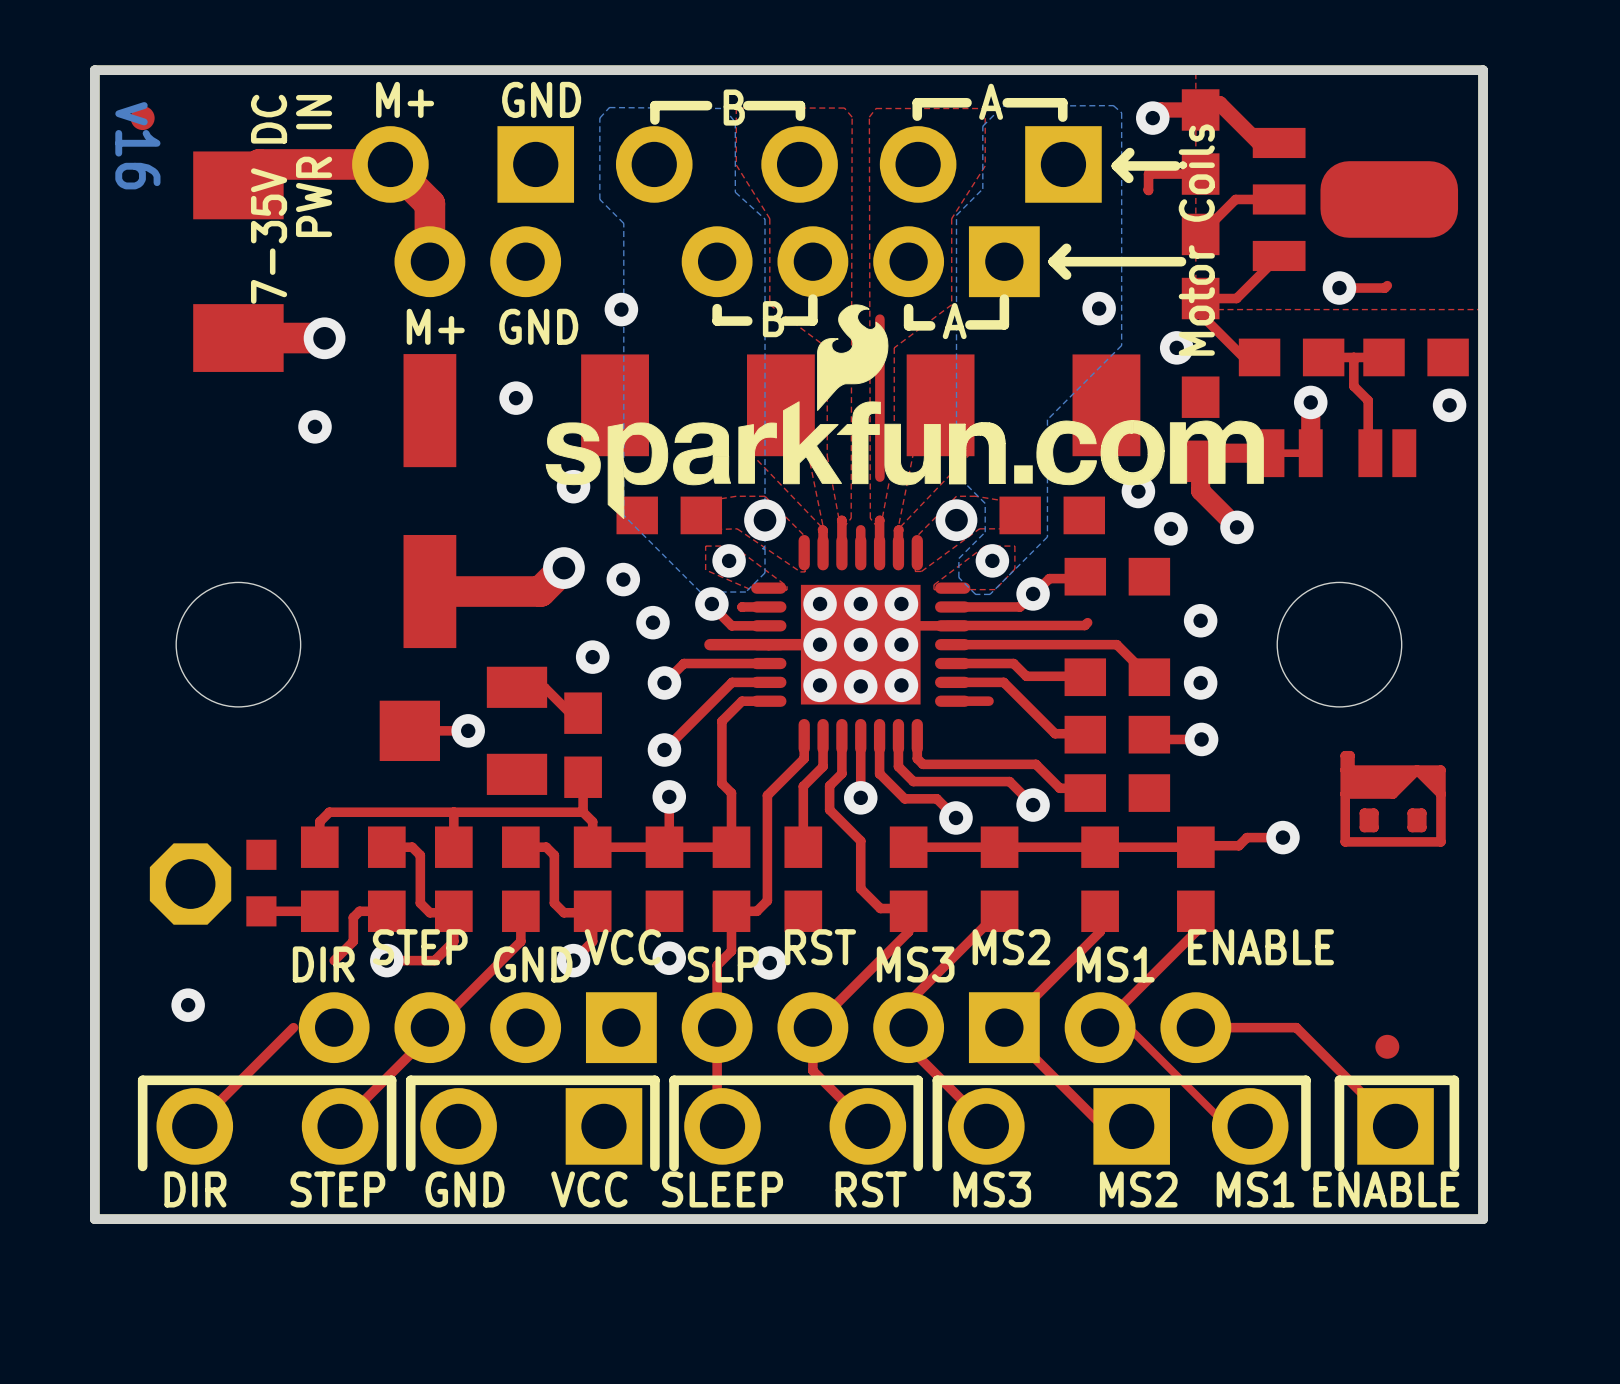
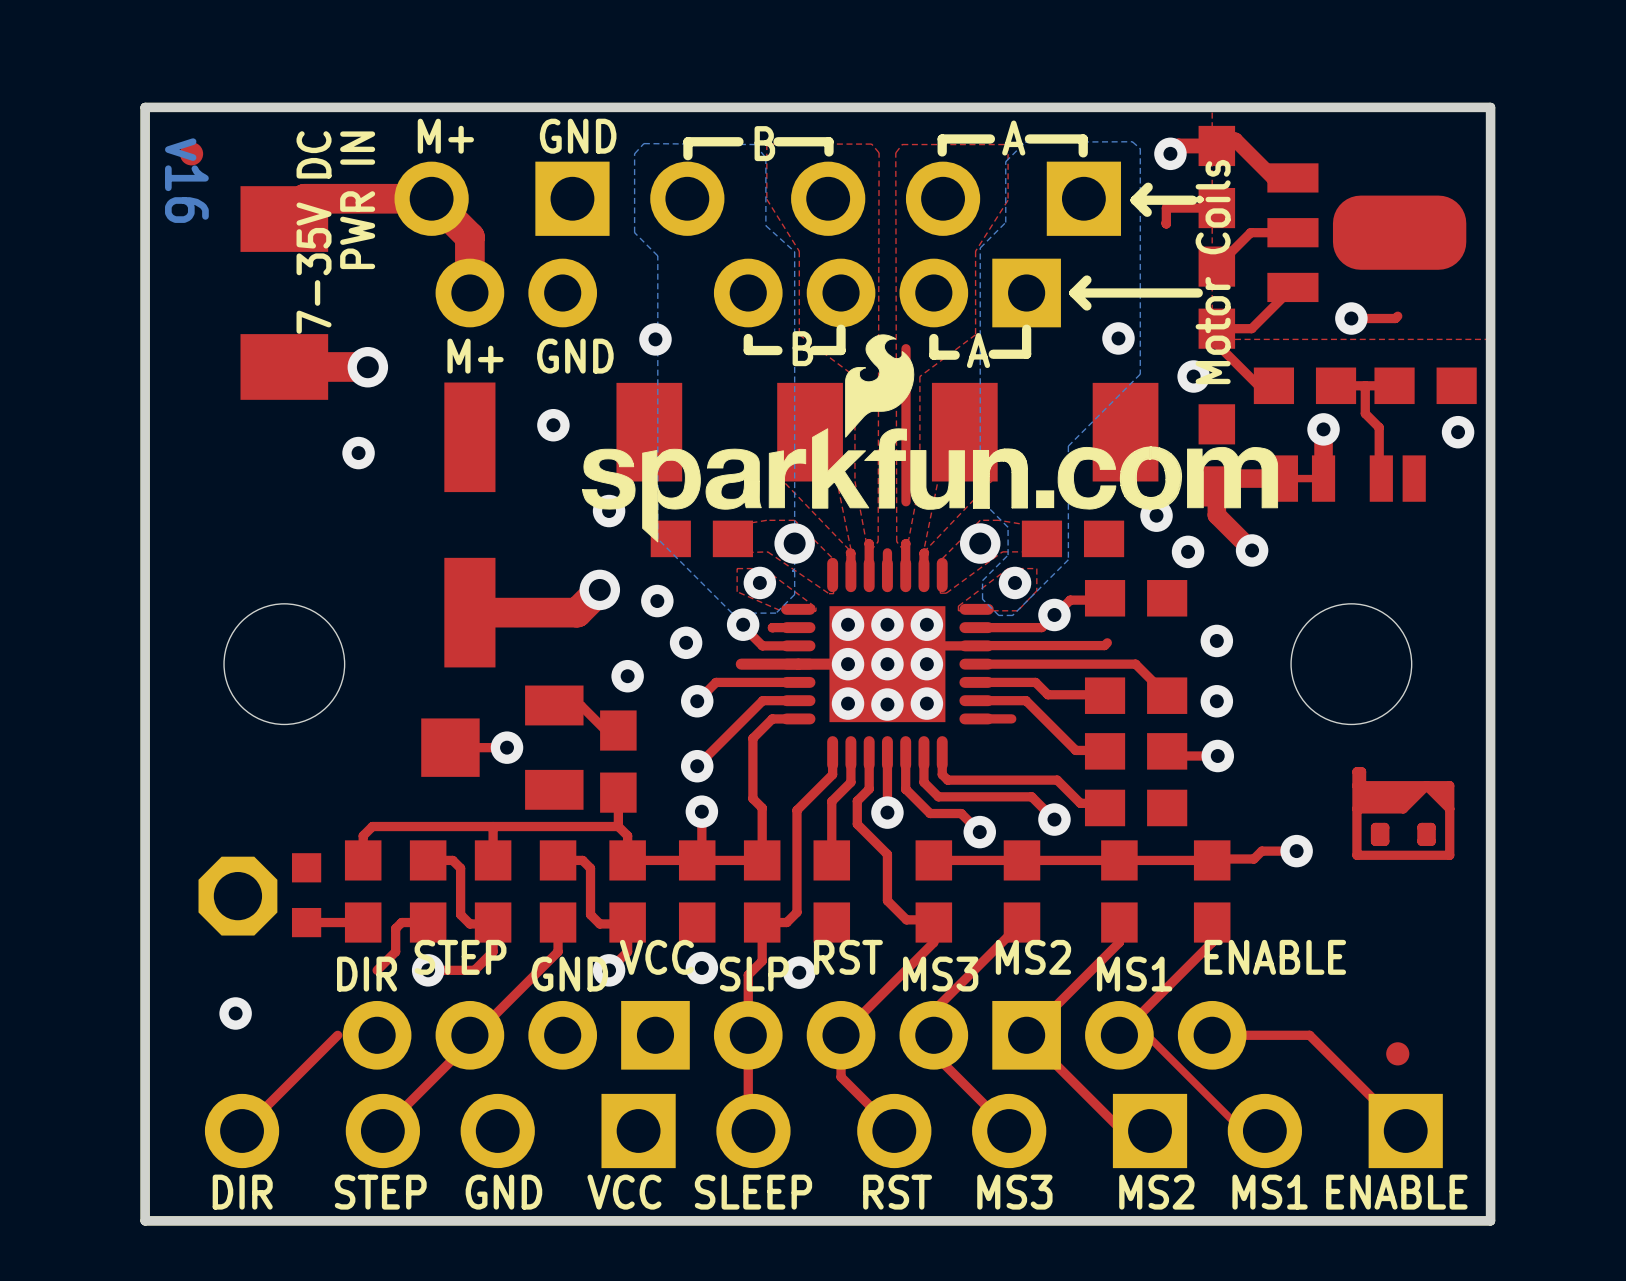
line: (391, 1166) (391, 1080) (142, 1080) (142, 1166) -> none
line: (654, 1166) (654, 1080) (410, 1080) (410, 1166) -> none
line: (918, 1166) (918, 1080) (674, 1080) (674, 1166) -> none
line: (1305, 1166) (1305, 1080) (937, 1080) (937, 1166) -> none
line: (1454, 1166) (1454, 1080) (1339, 1080) (1339, 1166) -> none

